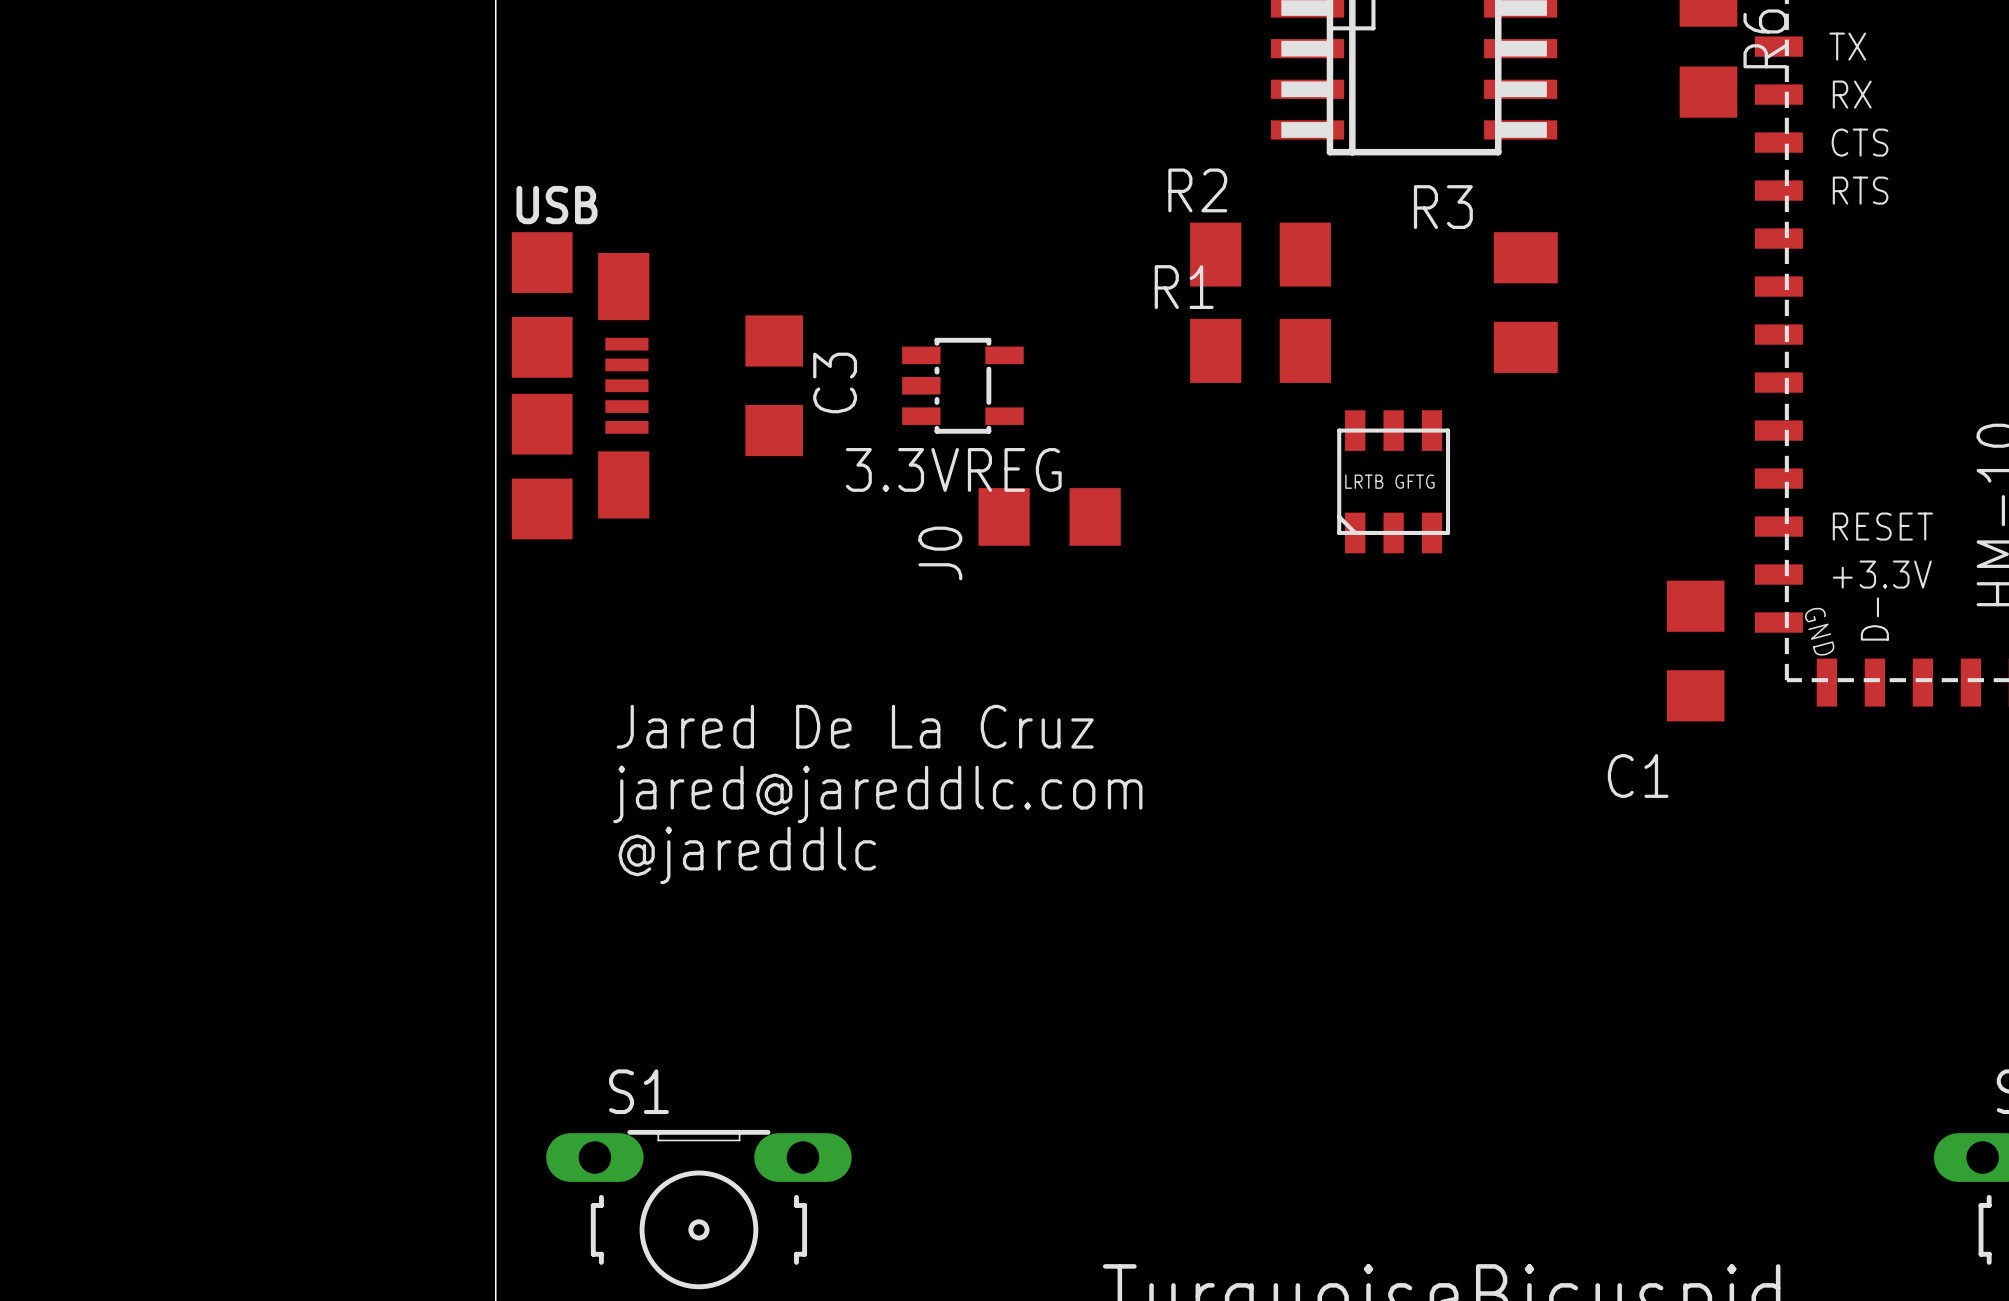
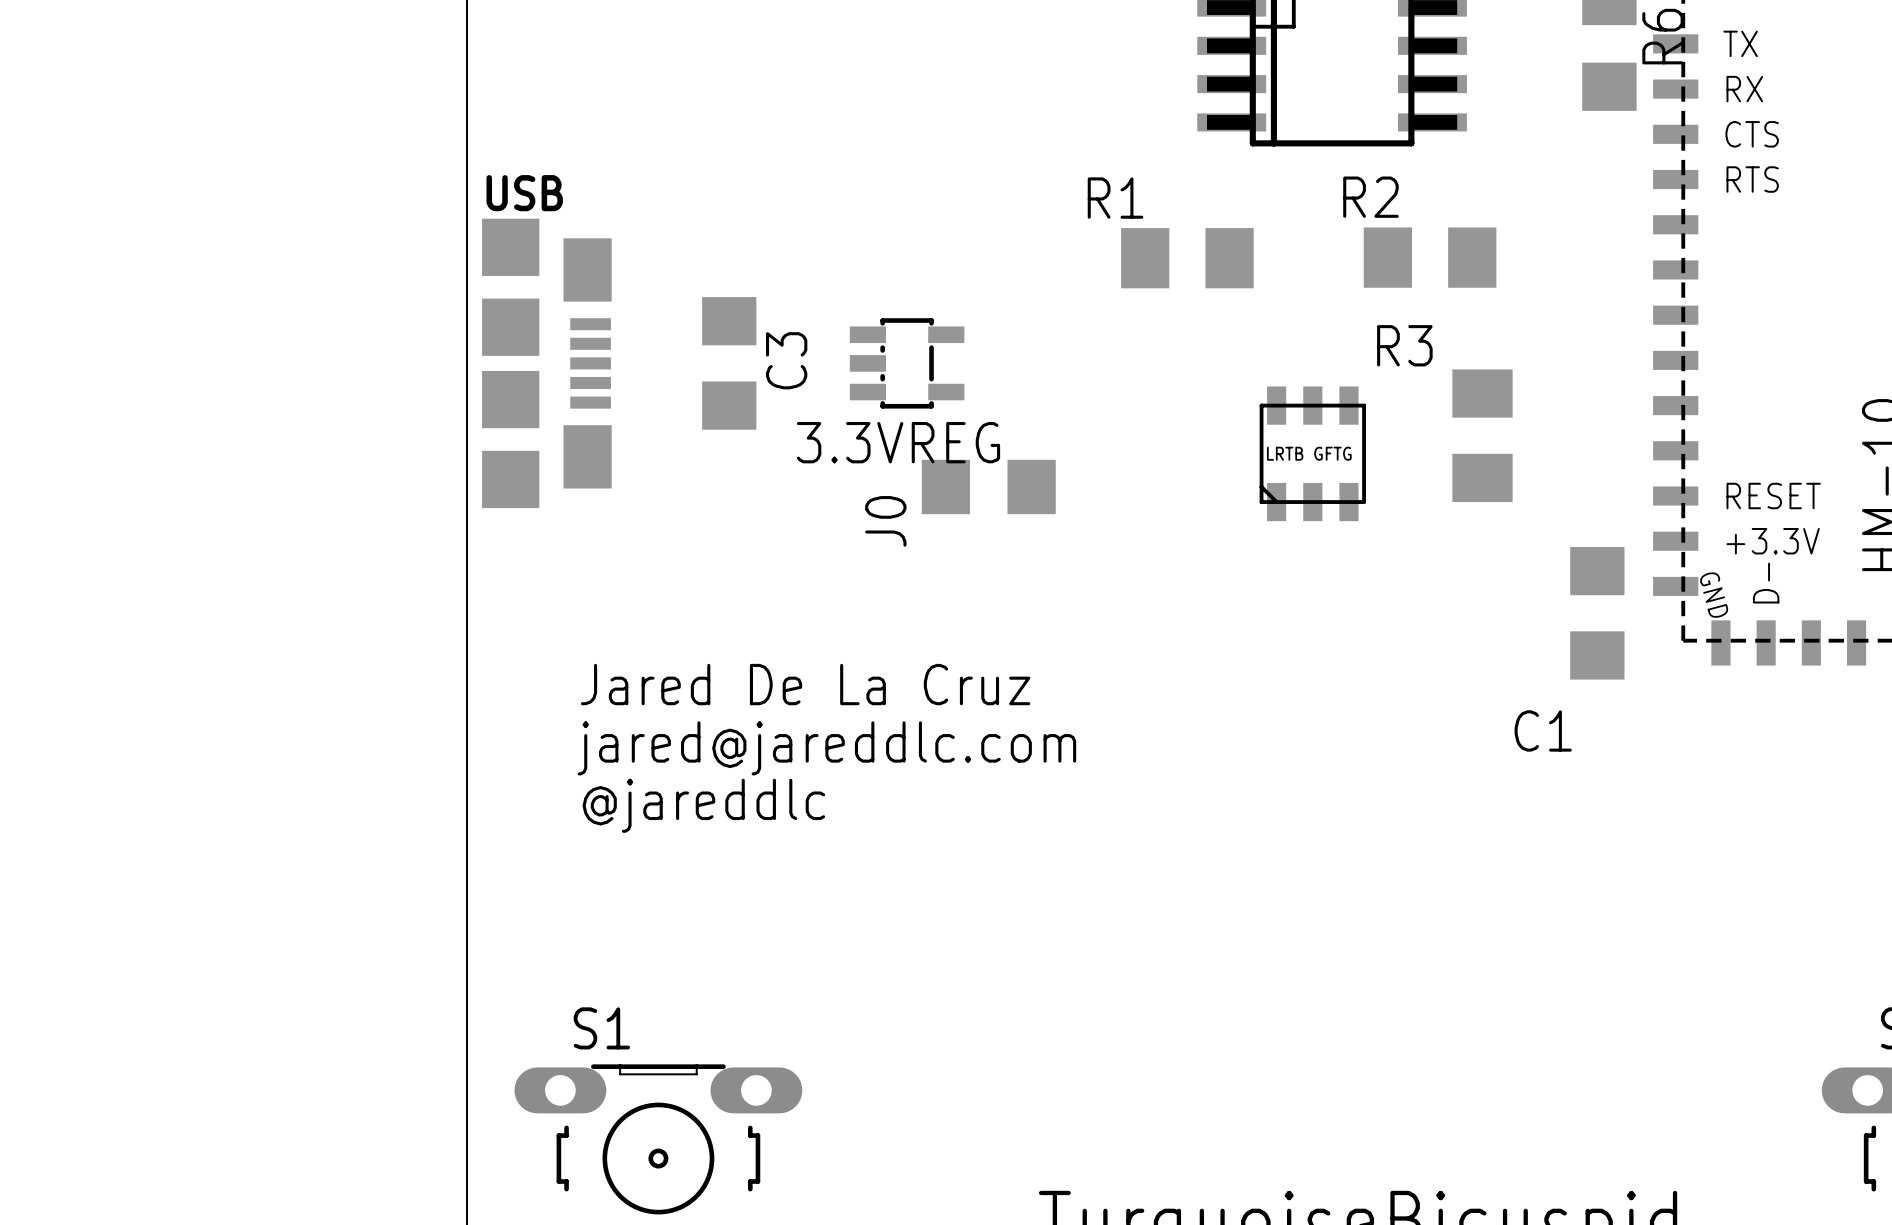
R2 position: (1260, 254) -> (1430, 257)
R3 position: (1525, 302) -> (1482, 435)
R1 position: (1260, 350) -> (1187, 258)

